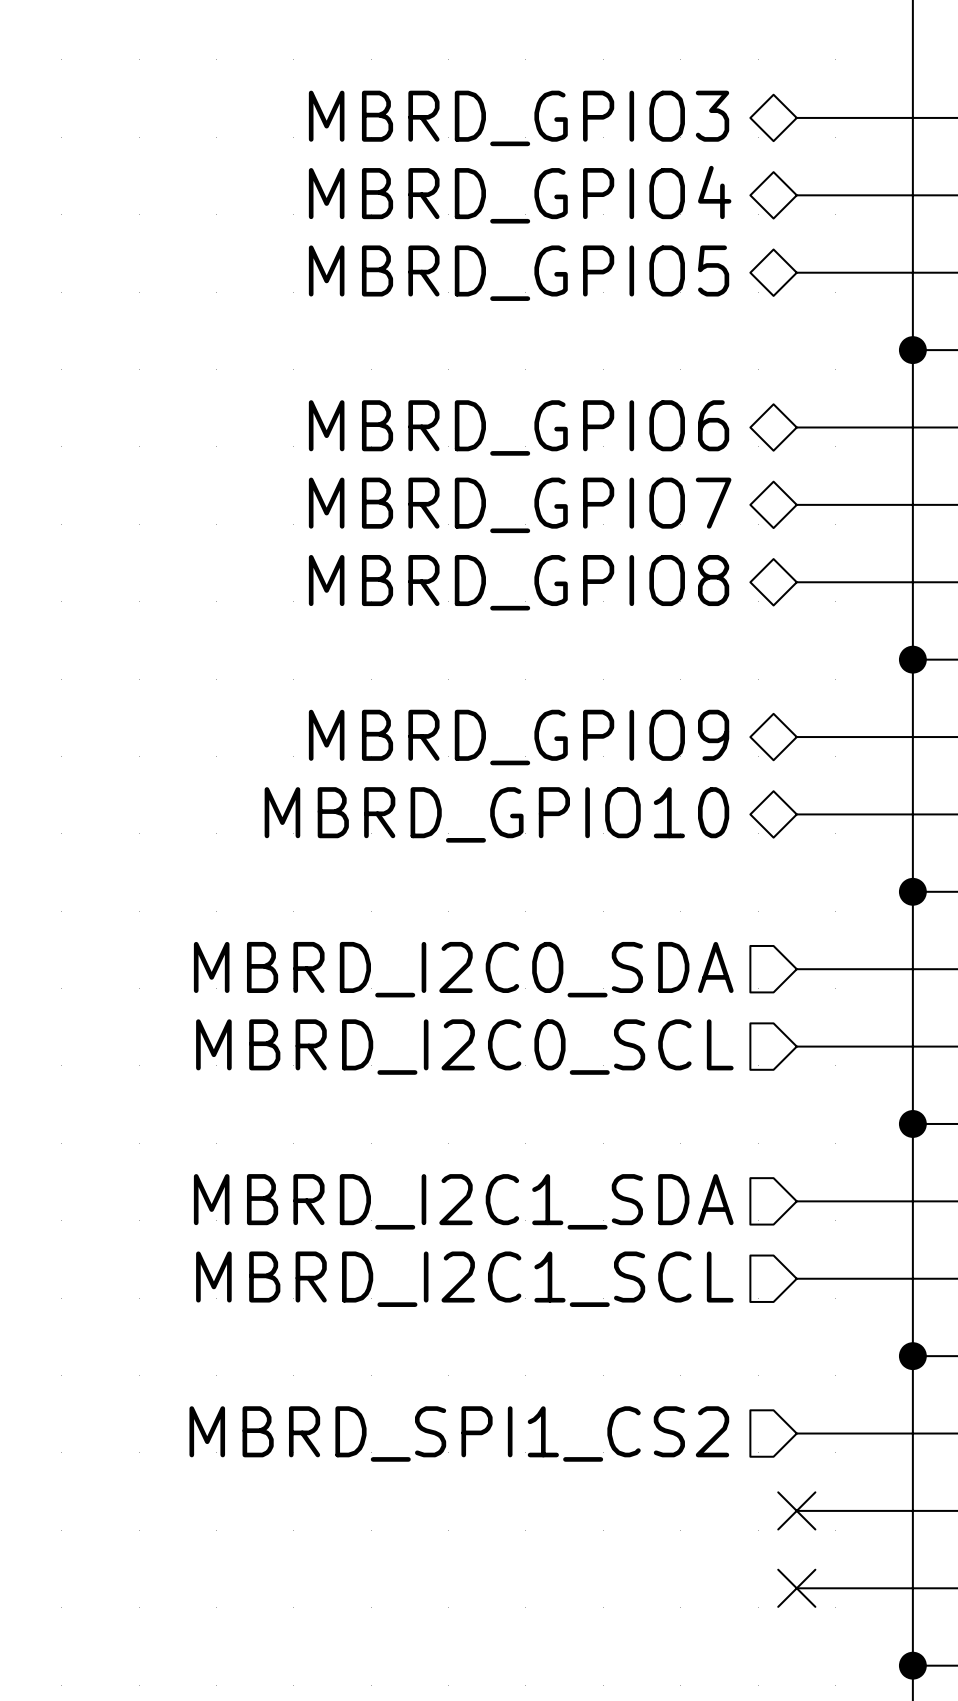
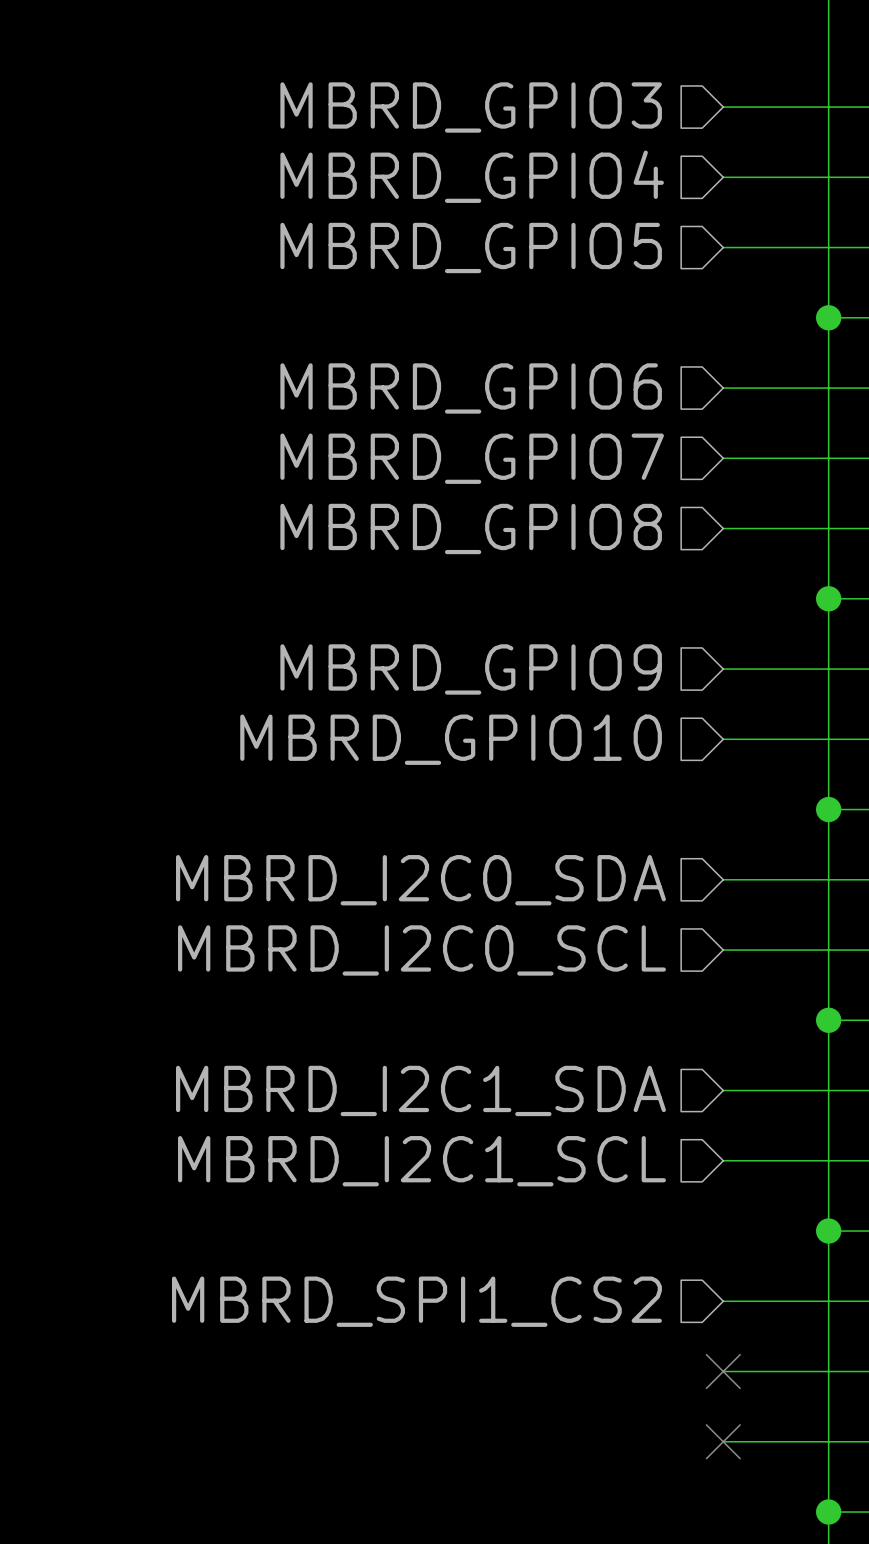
hierarchical label shape: bidirectional (519, 118) -> input (471, 107)
hierarchical label shape: bidirectional (520, 194) -> input (472, 176)
hierarchical label shape: bidirectional (519, 273) -> input (471, 247)
hierarchical label shape: bidirectional (519, 427) -> input (471, 388)
hierarchical label shape: bidirectional (520, 505) -> input (472, 458)
hierarchical label shape: bidirectional (519, 582) -> input (471, 528)
hierarchical label shape: bidirectional (519, 737) -> input (471, 669)
hierarchical label shape: bidirectional (496, 814) -> input (451, 739)

